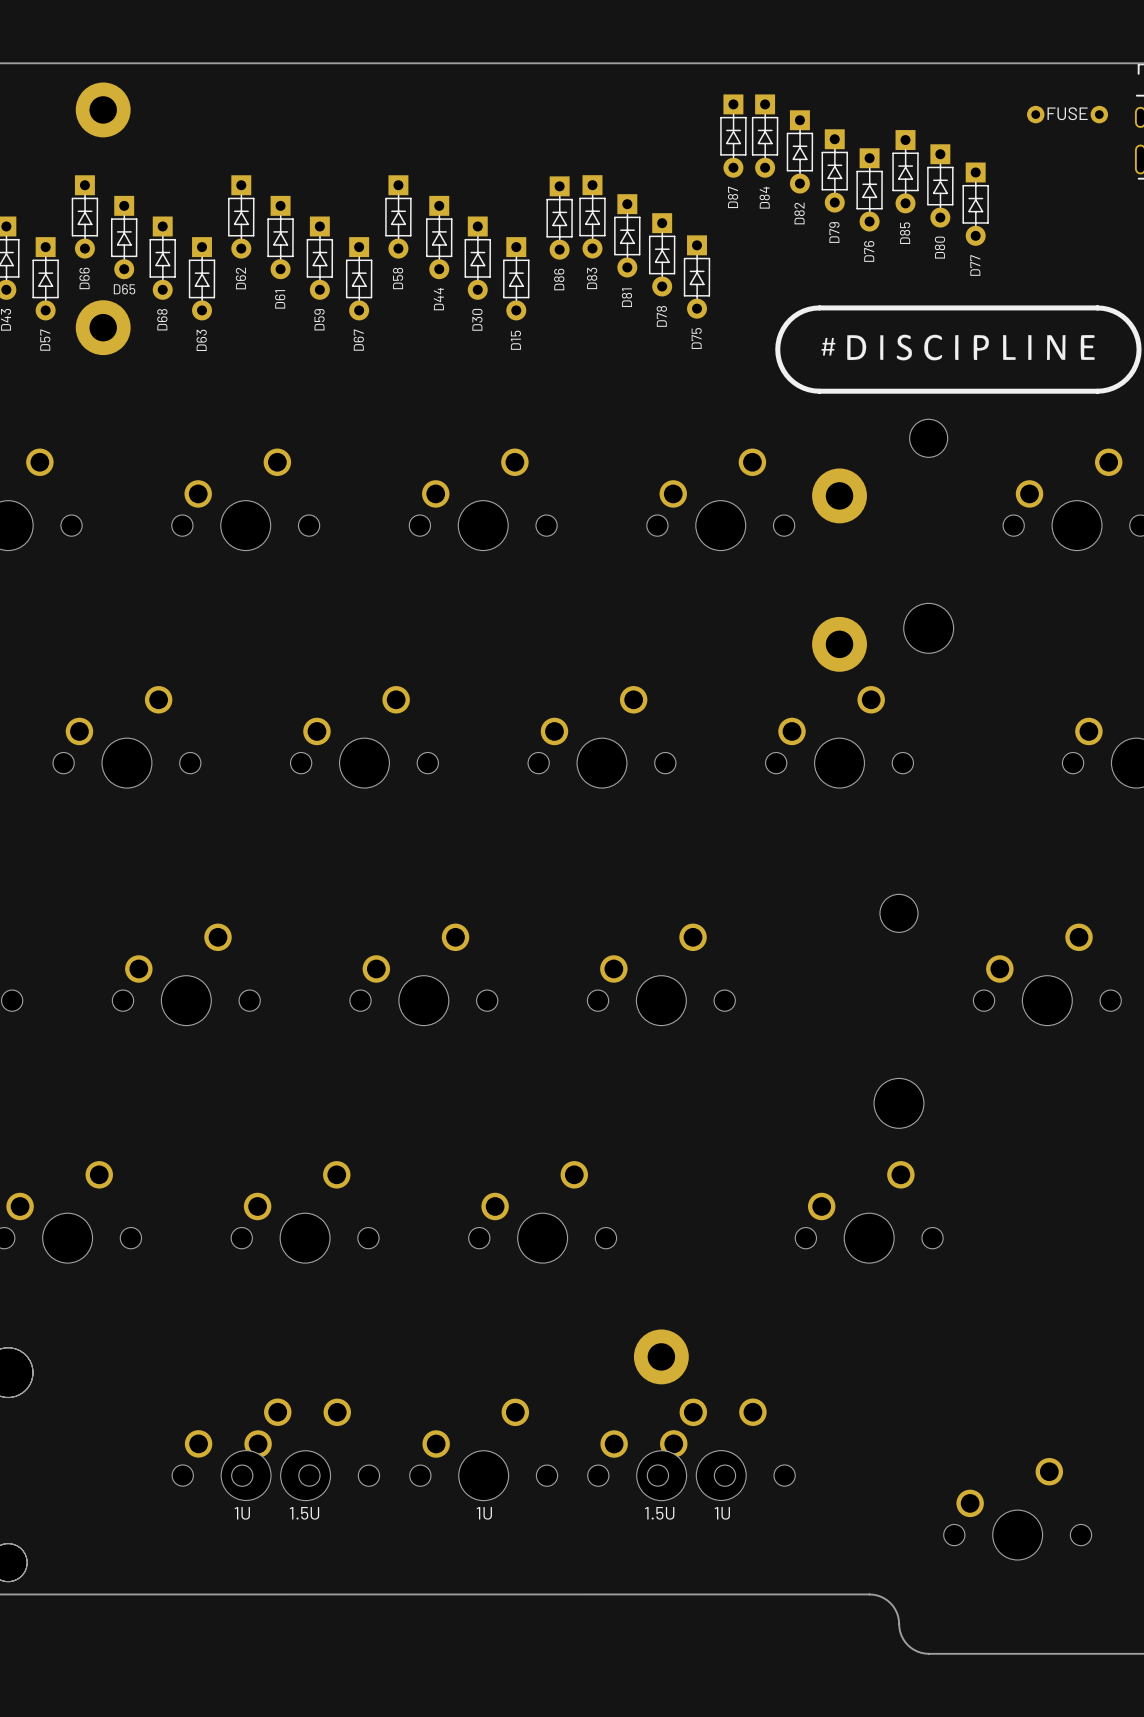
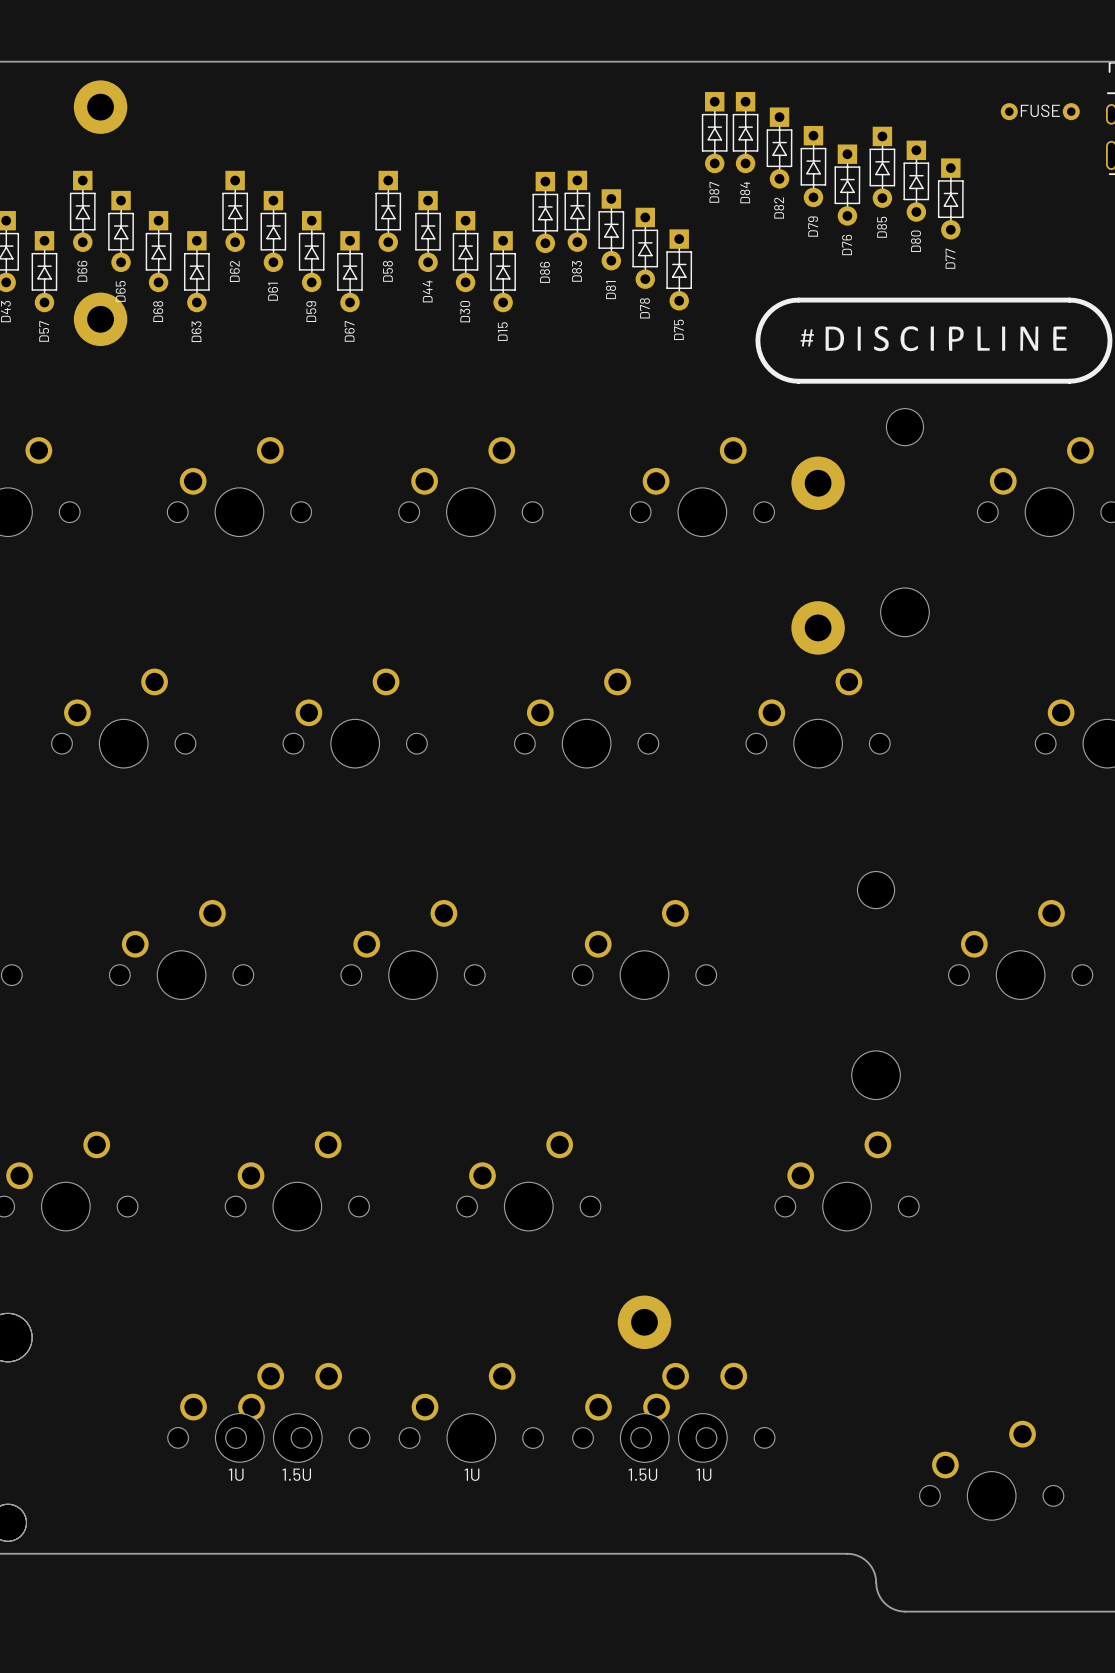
D65 name rotation: 0° (124, 289) -> 90° counterclockwise (120, 291)

